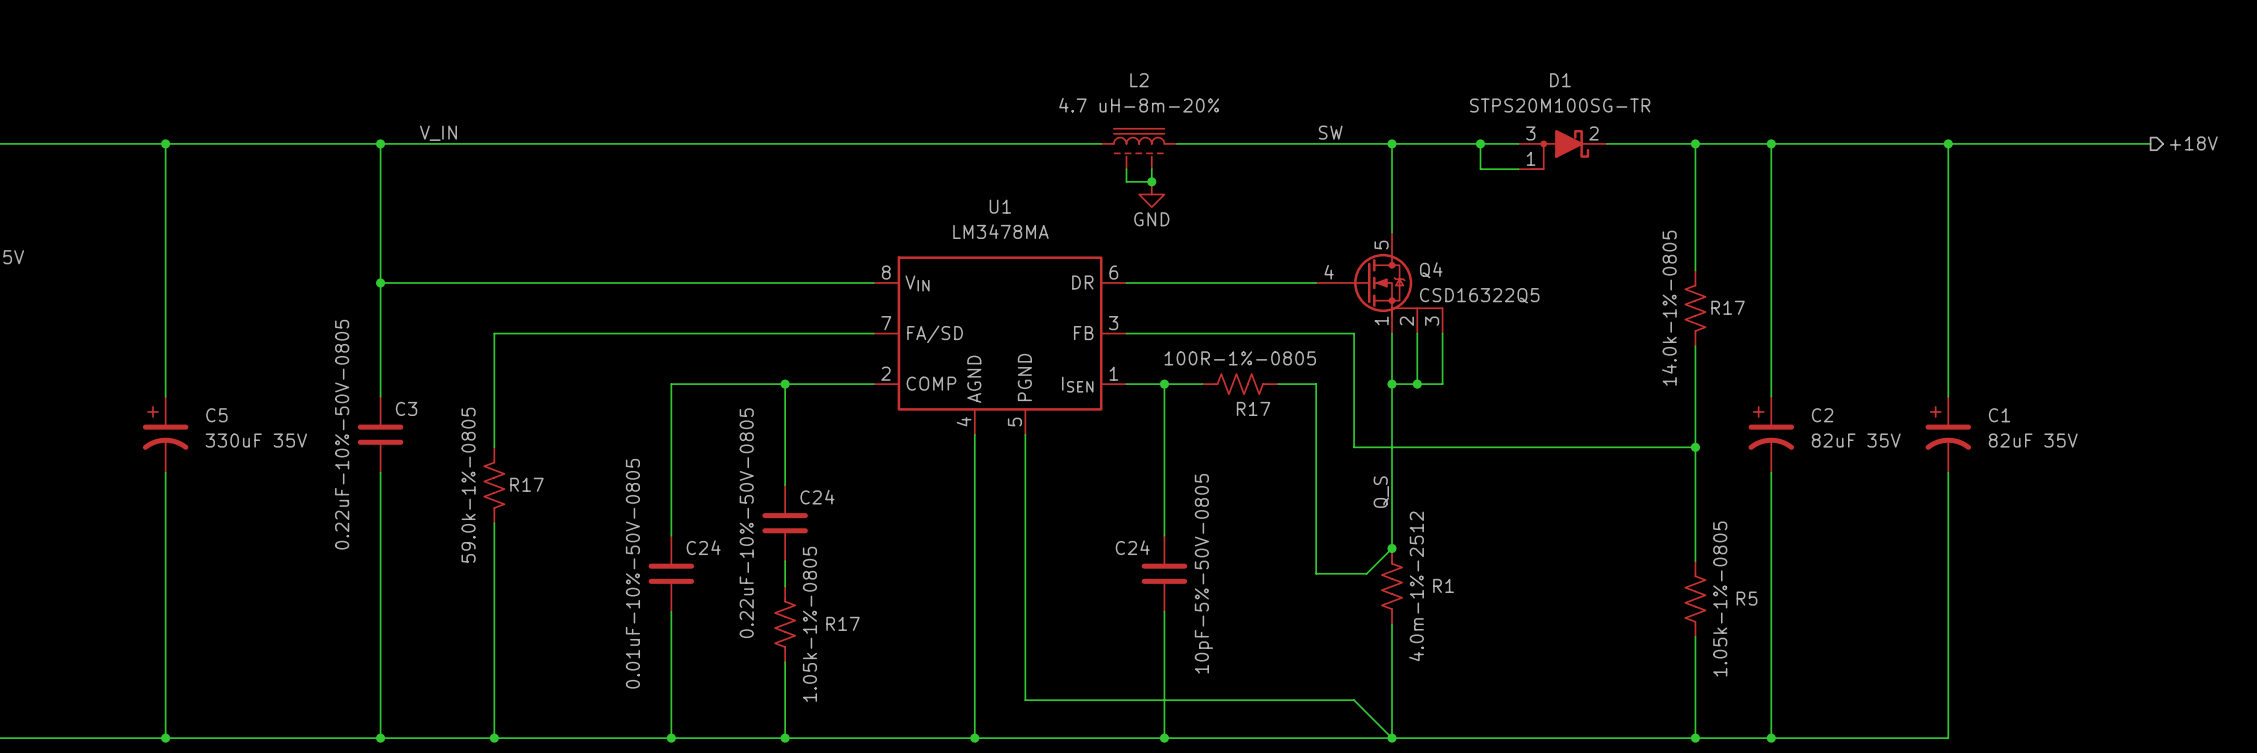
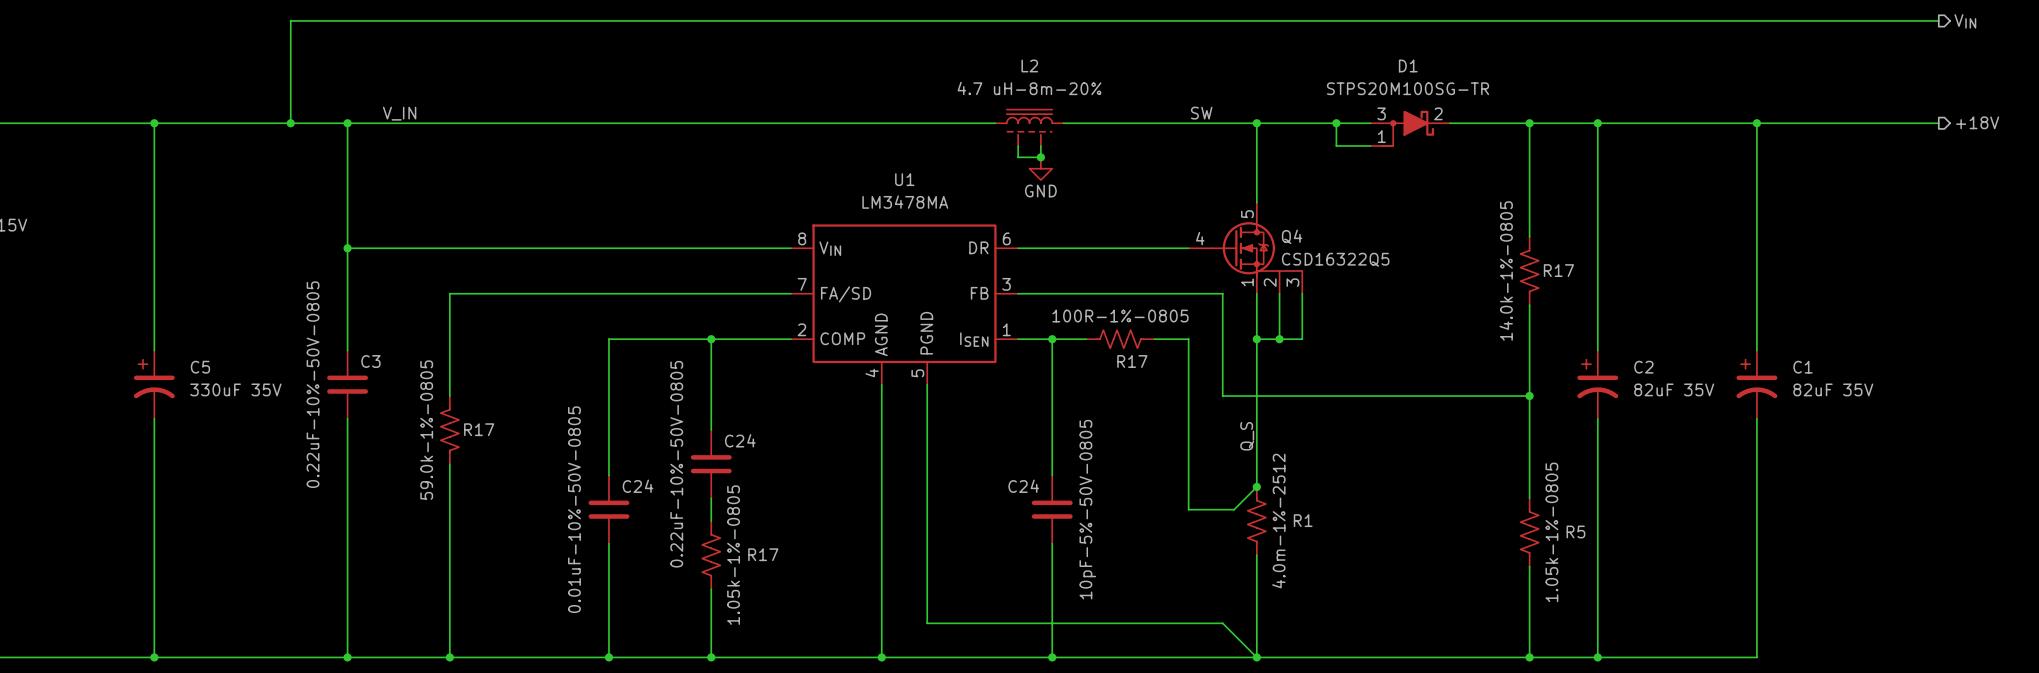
wire: none -> (1938, 20) (290, 20) (290, 123)
hierarchical label: none -> VIN (1965, 21)
junction: none -> (290, 123)

